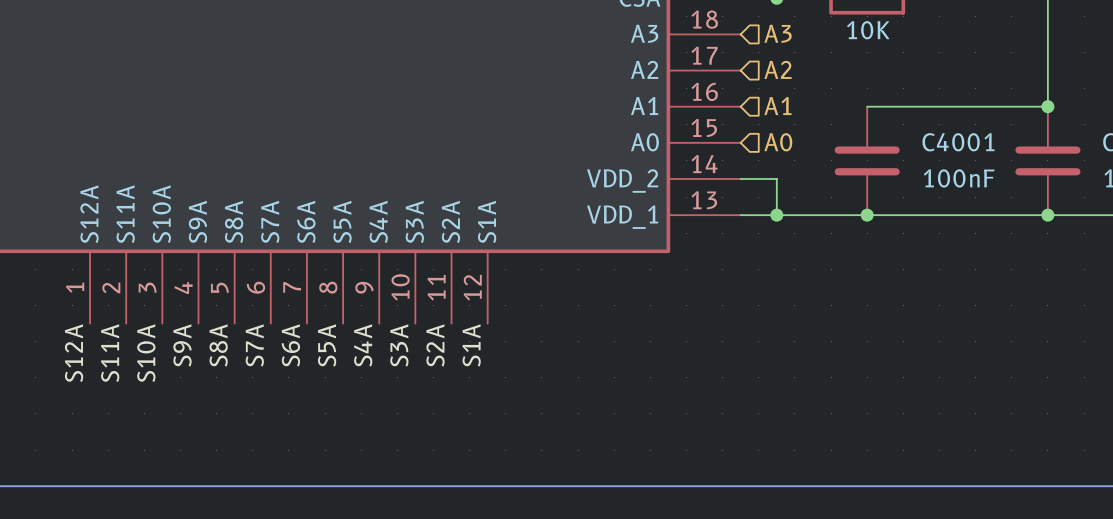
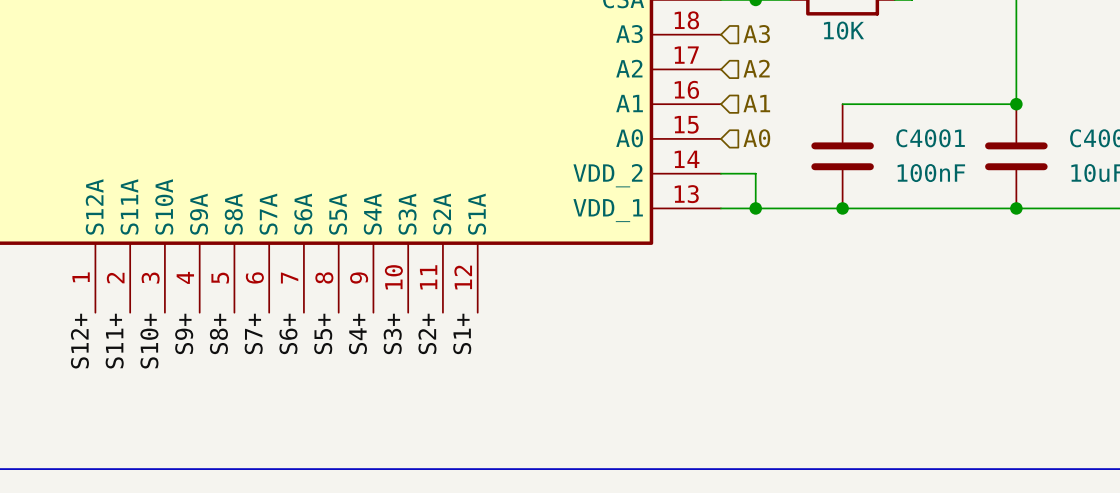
label: S9A (182, 345) -> S9+ (184, 333)
label: S8A (218, 345) -> S8+ (218, 333)
label: S7A (254, 345) -> S7+ (253, 333)
label: S6A (290, 345) -> S6+ (288, 333)
label: S5A (327, 345) -> S5+ (323, 333)
label: S4A (363, 345) -> S4+ (357, 333)
label: S3A (399, 345) -> S3+ (392, 333)
label: S2A (435, 345) -> S2+ (427, 333)
label: S1A (471, 345) -> S1+ (462, 333)
label: S12A (74, 353) -> S12+ (79, 341)
label: S11A (110, 353) -> S11+ (114, 341)
label: S10A (146, 353) -> S10+ (149, 341)

